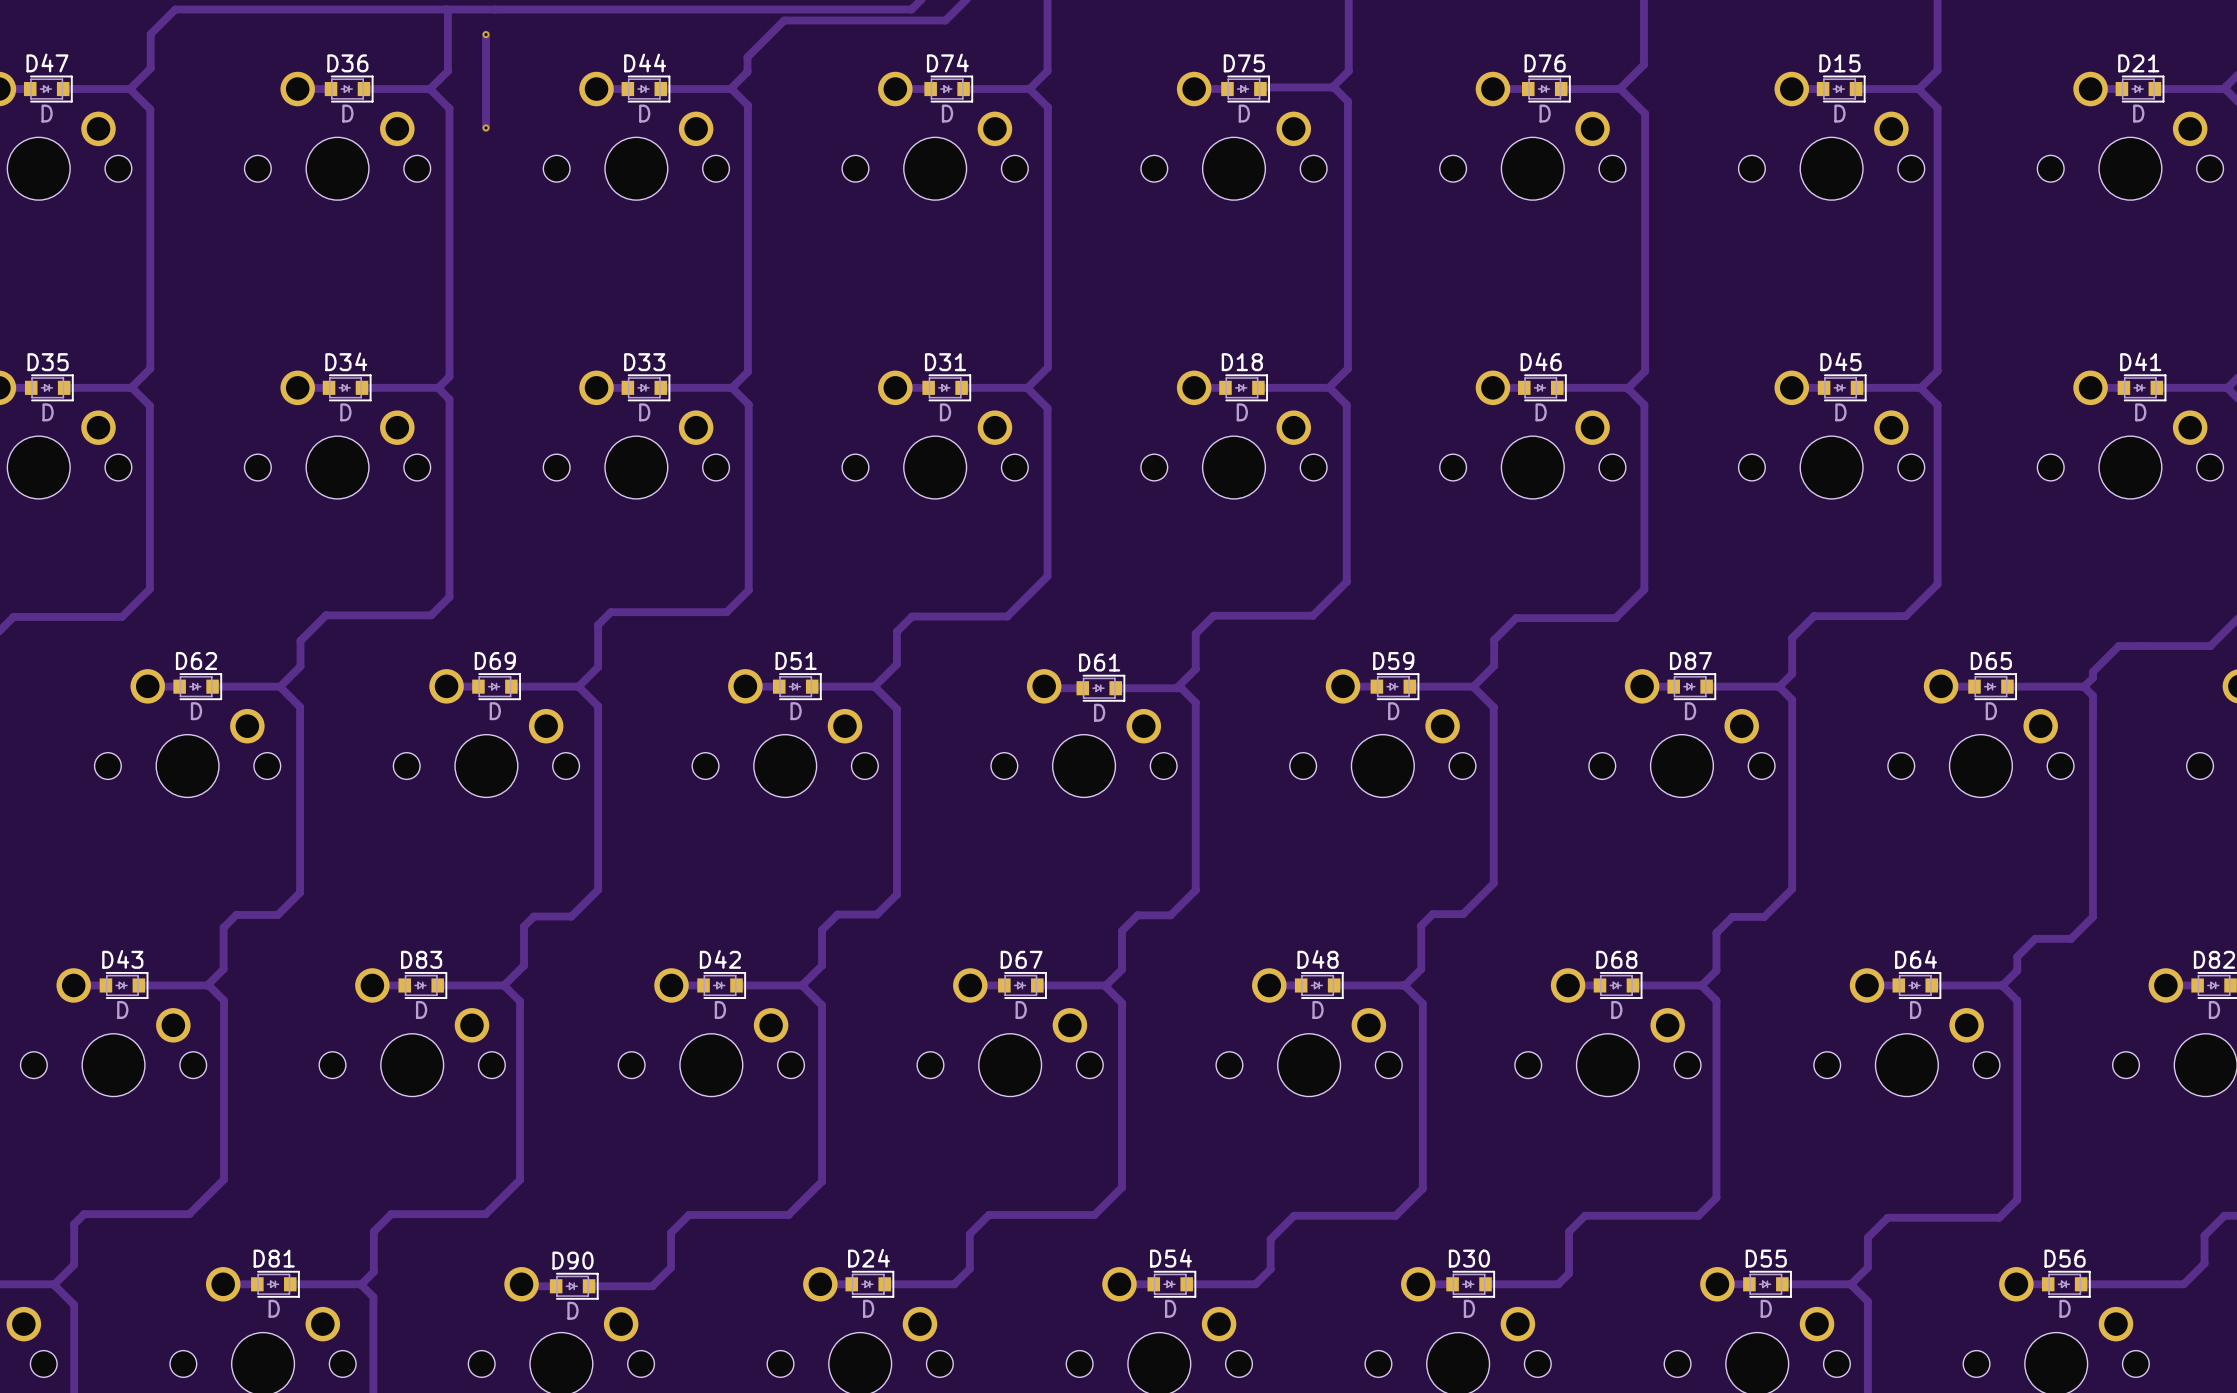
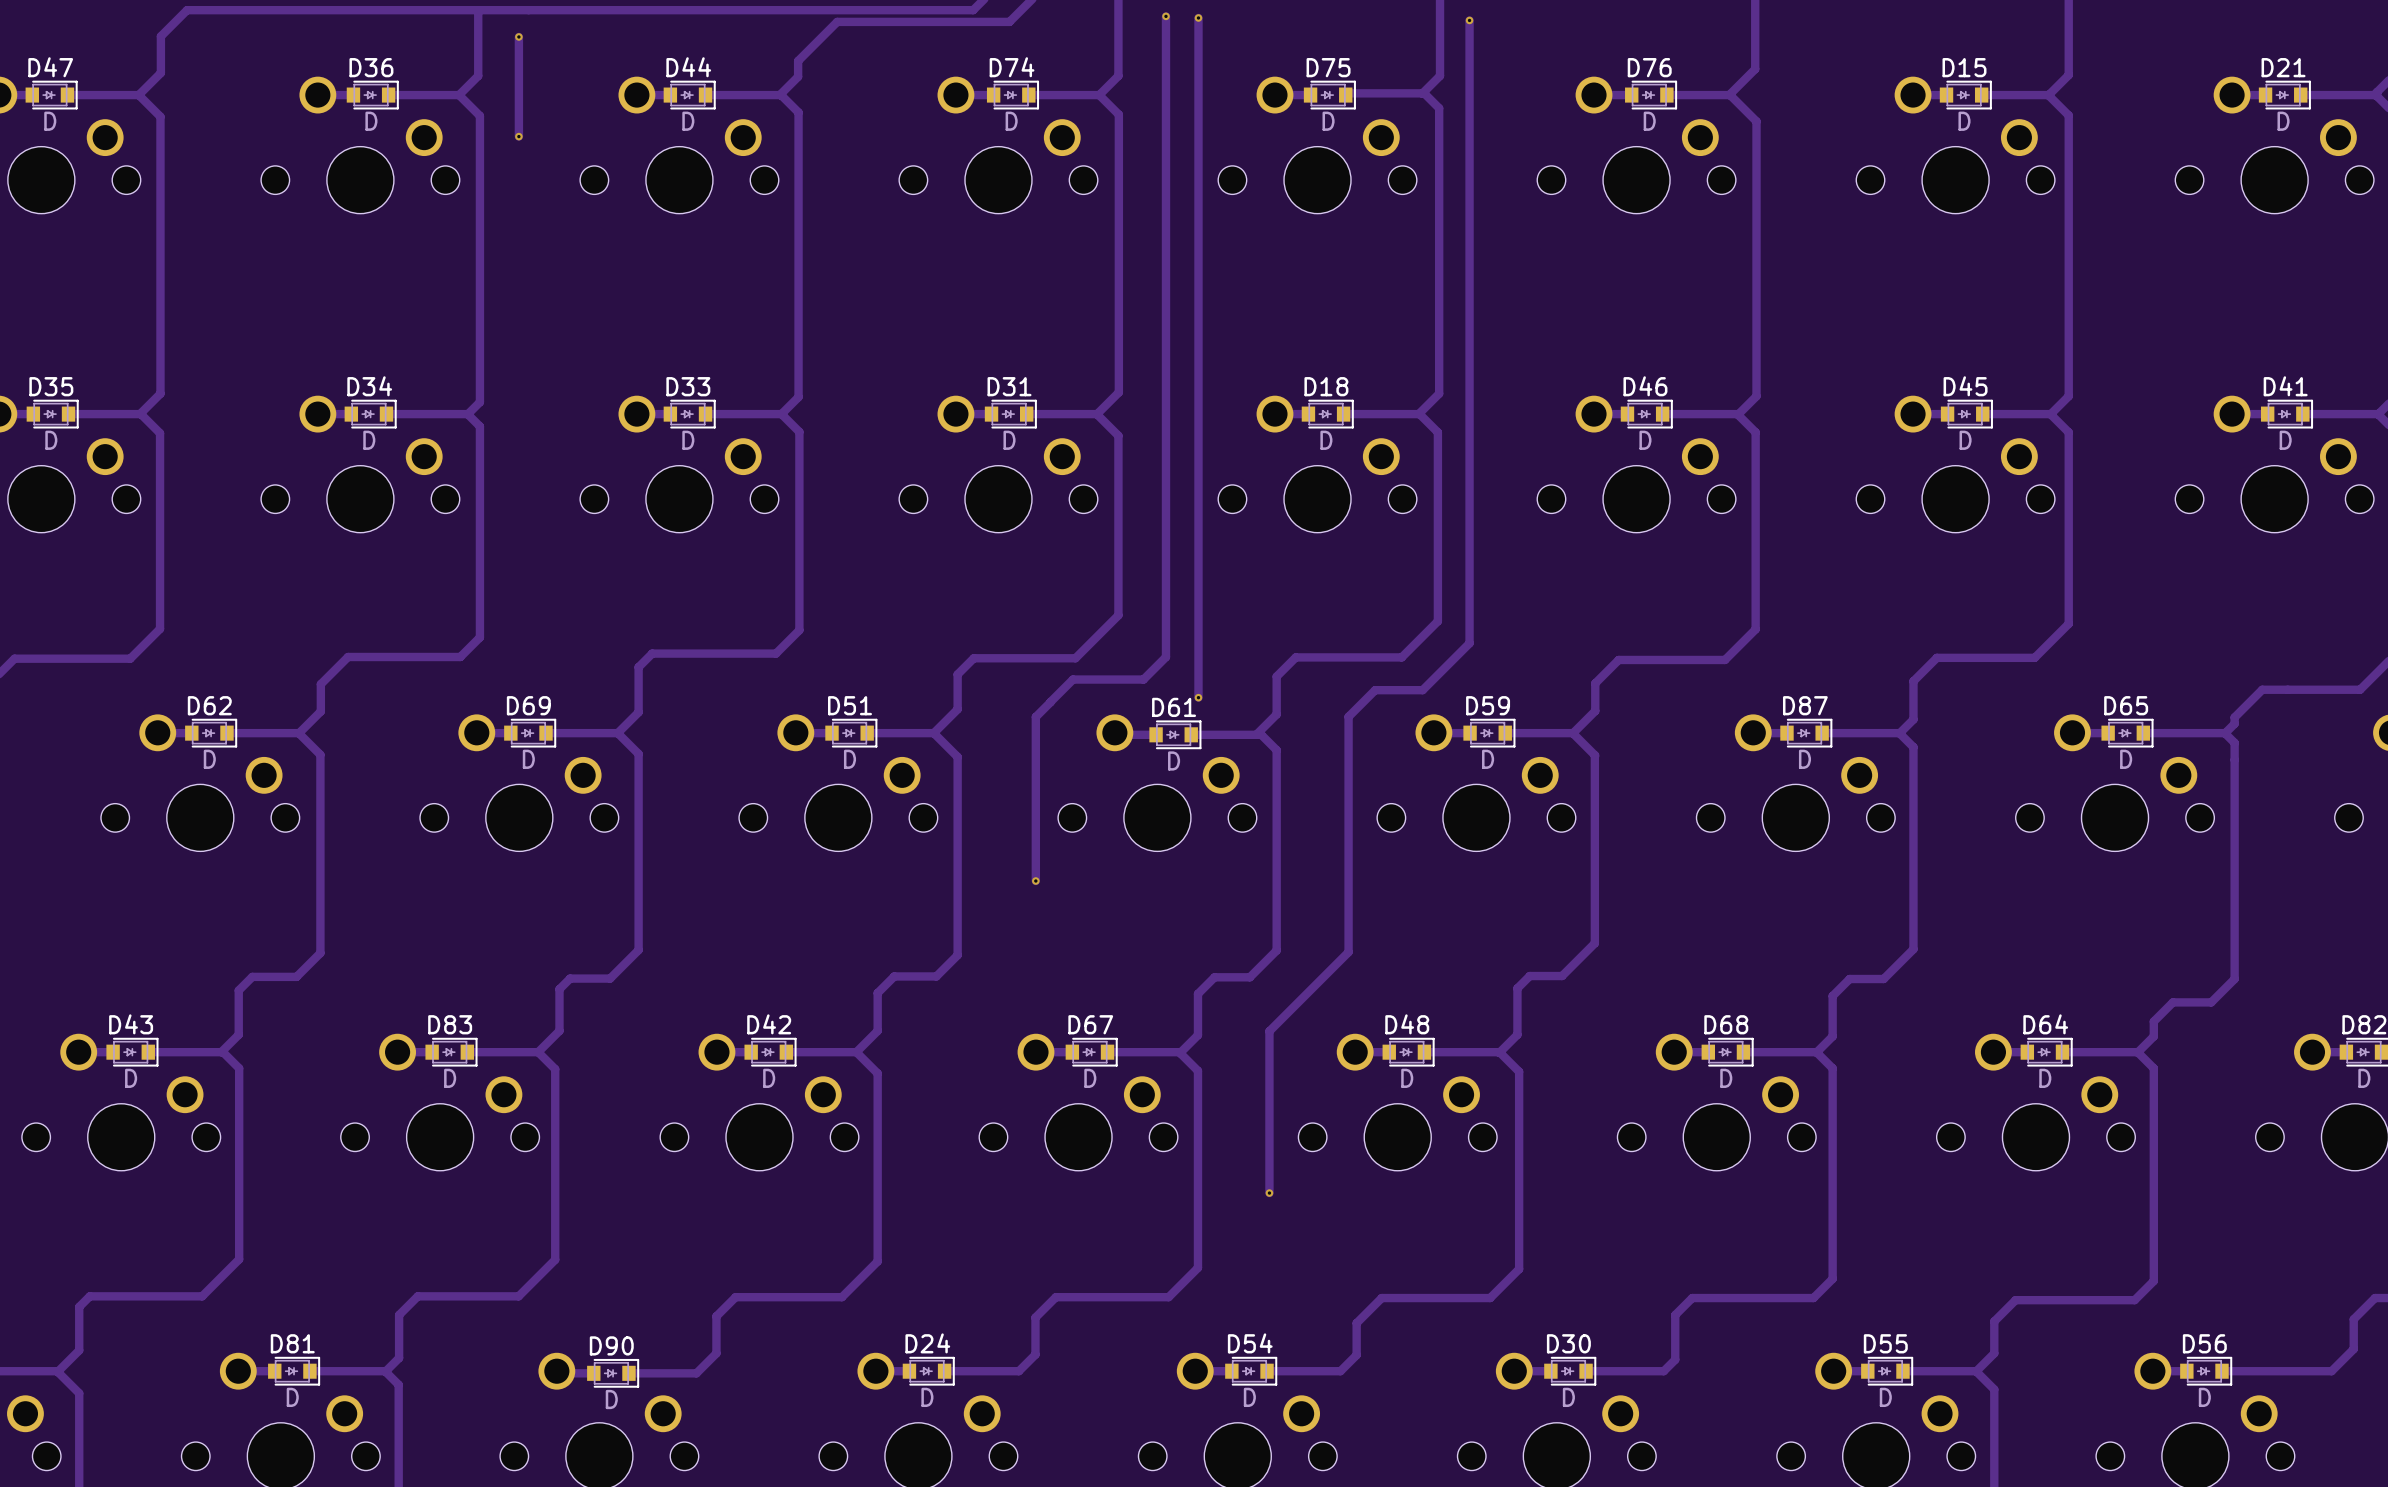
track: none -> (1165, 16) (1165, 657) (1143, 679) (1073, 679) (1050, 701)
via: none -> (1165, 16)
track: none -> (1198, 17) (1198, 697)
via: none -> (1198, 17)
track: none -> (1469, 20) (1469, 643) (1422, 690) (1375, 690) (1348, 716) (1348, 952) (1269, 1031) (1269, 1193)
via: none -> (1469, 20)
via: none -> (1198, 697)
track: none -> (1050, 702) (1035, 716) (1035, 881)
via: none -> (1035, 881)
via: none -> (1269, 1193)

